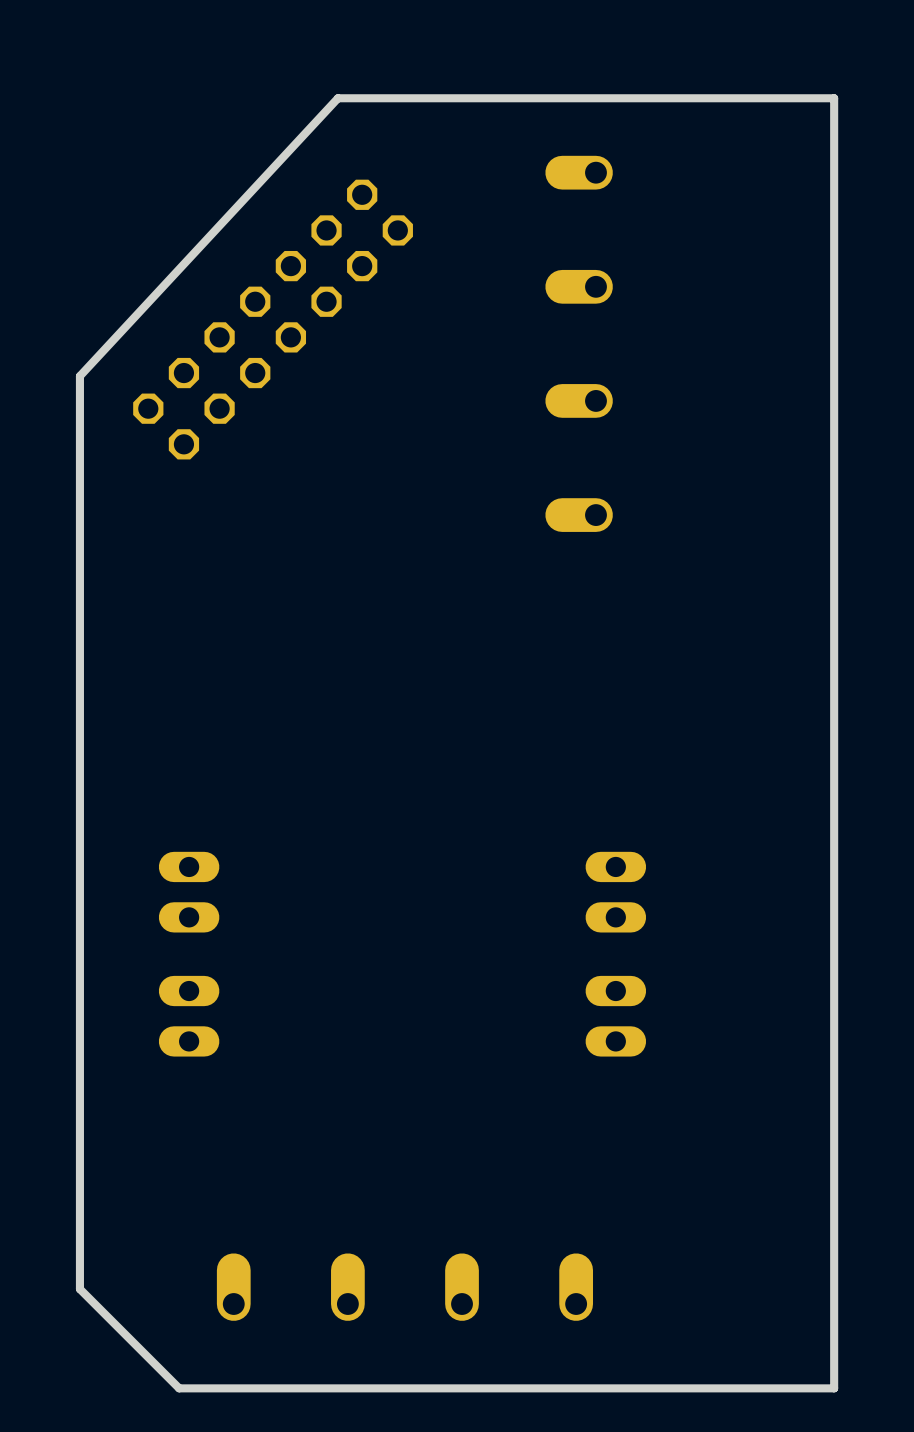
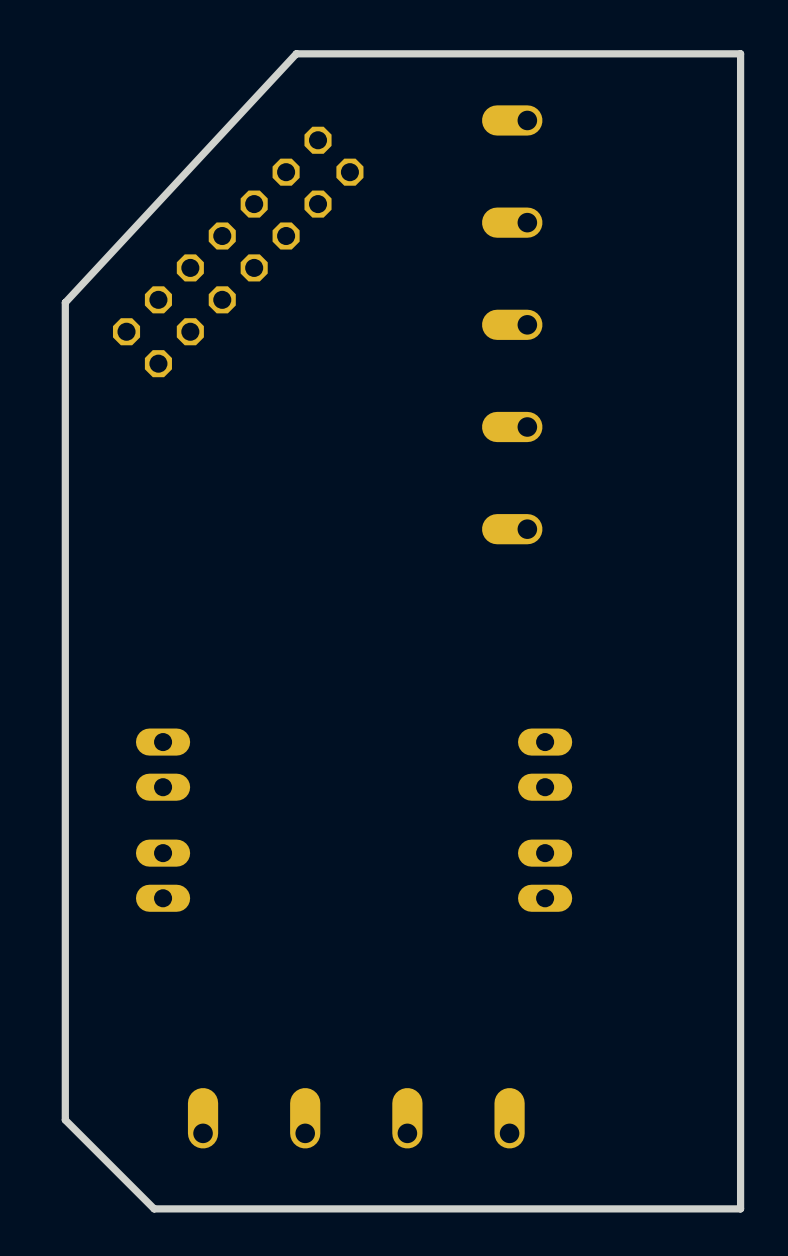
part: none -> (512, 529)

